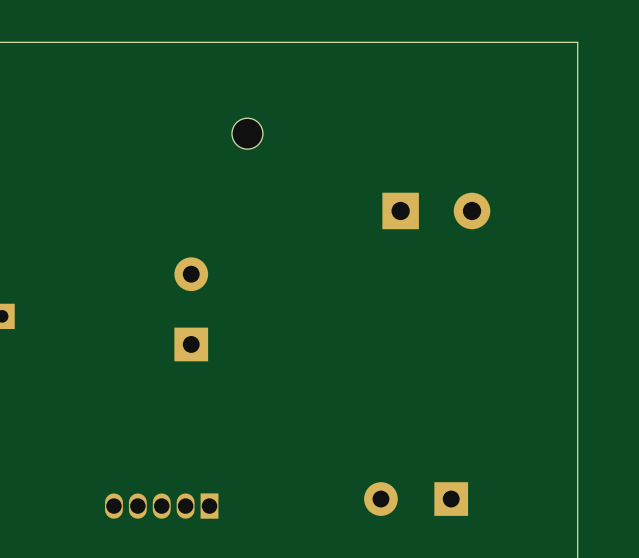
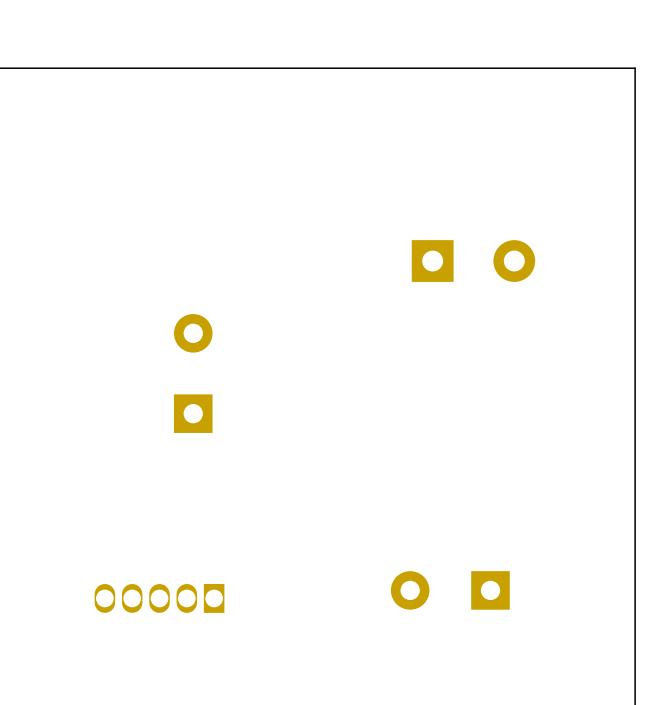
part: (247, 133) -> none

